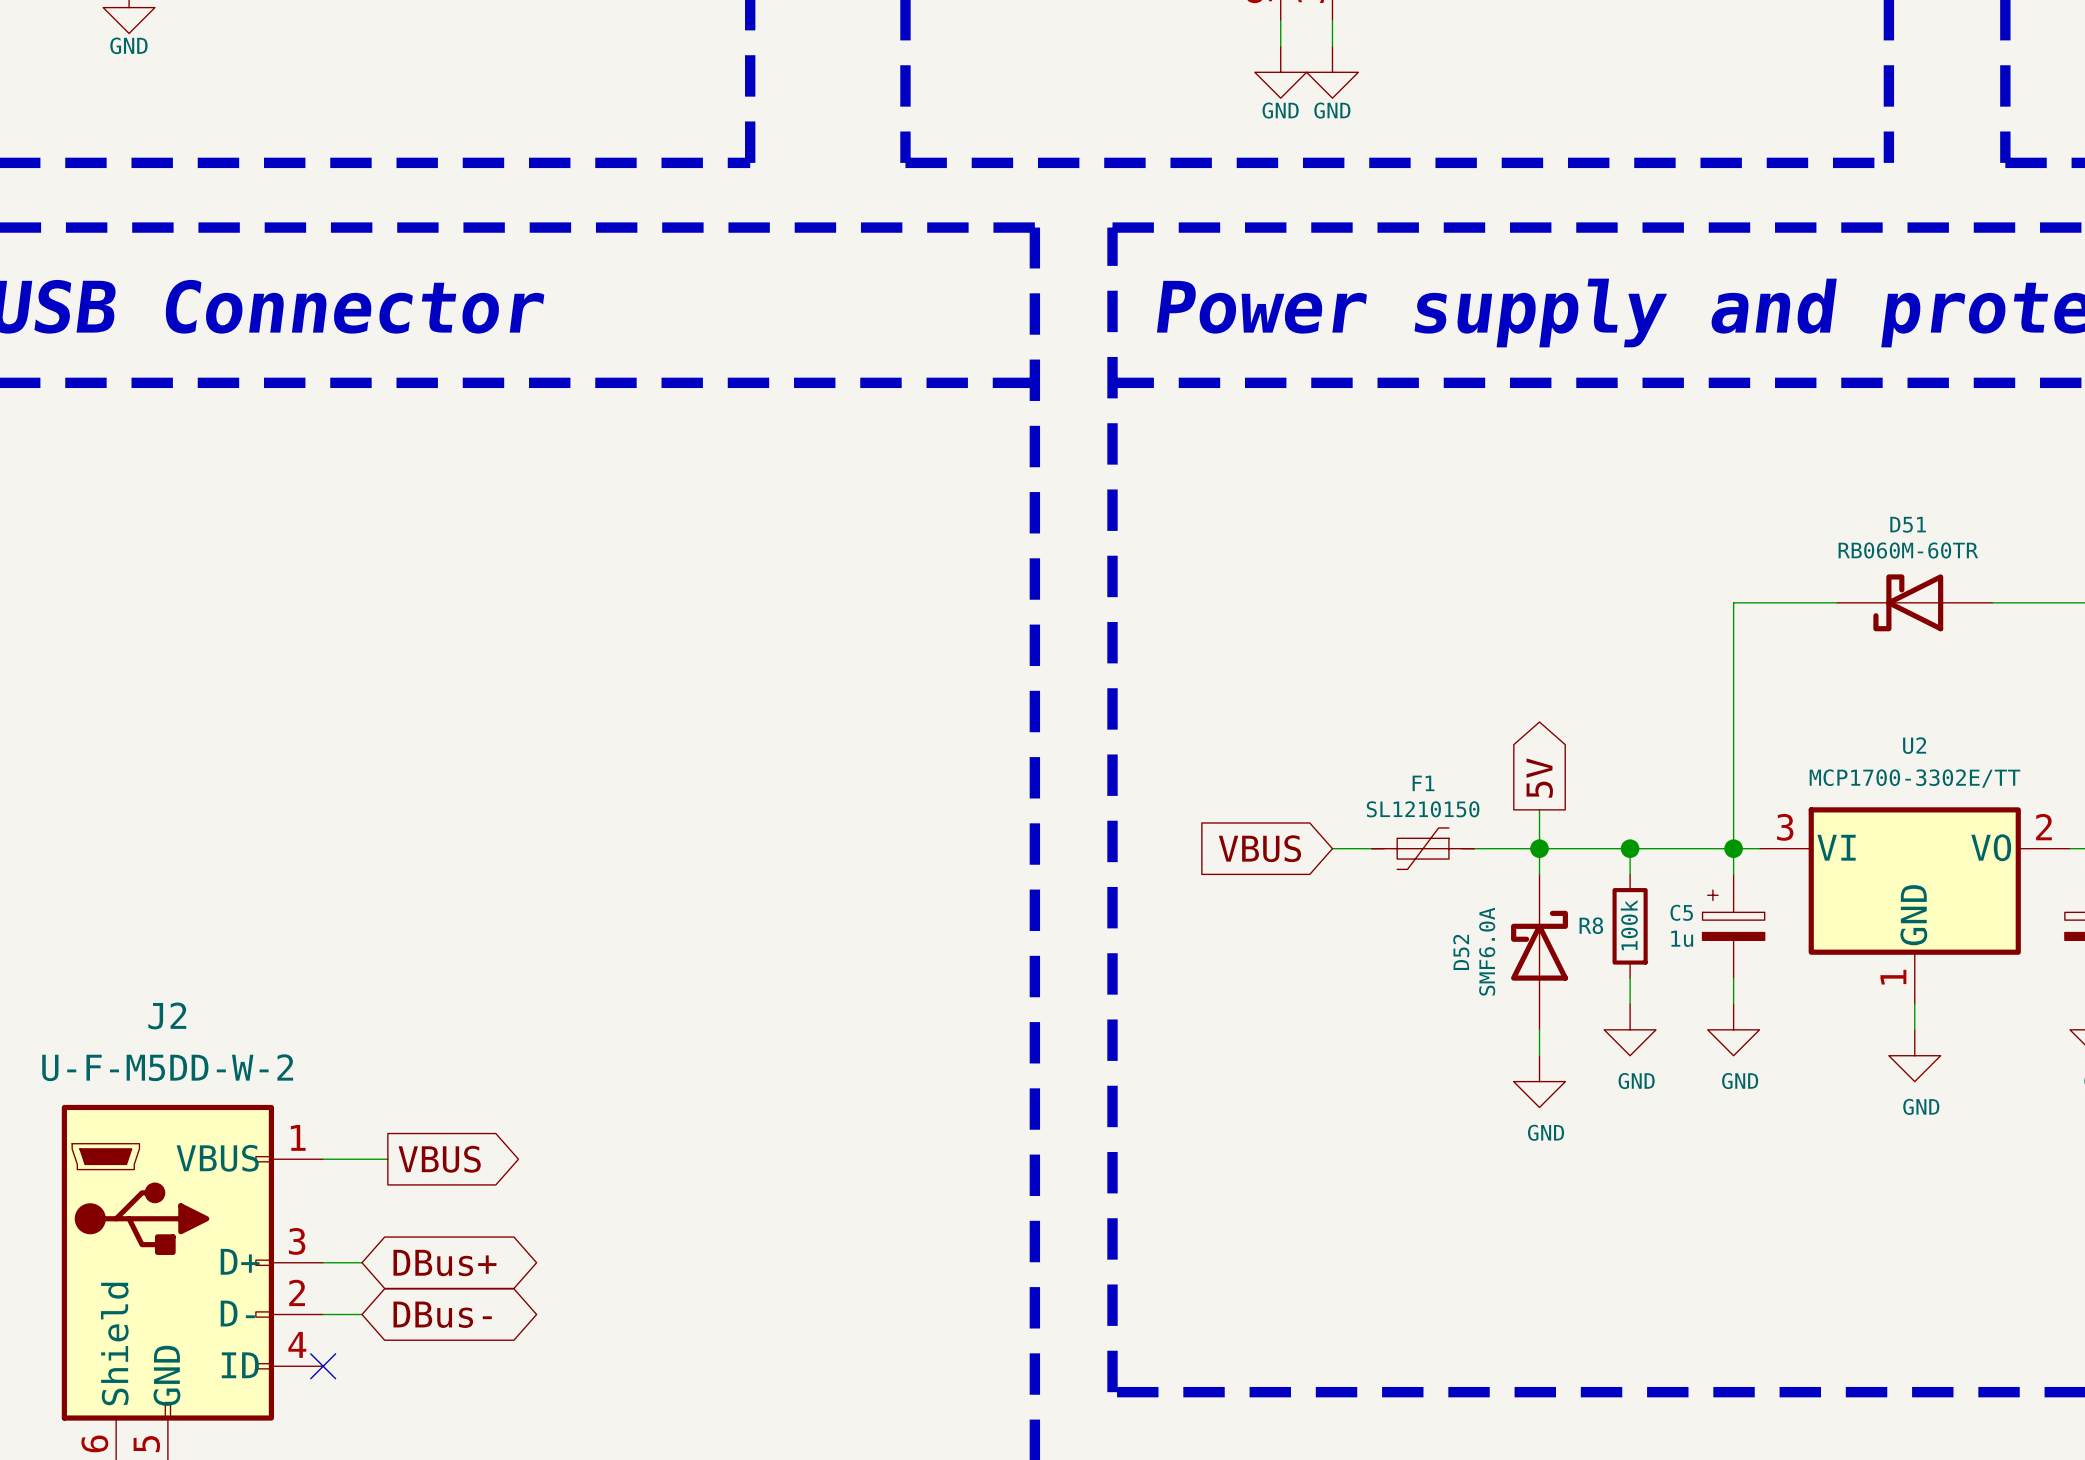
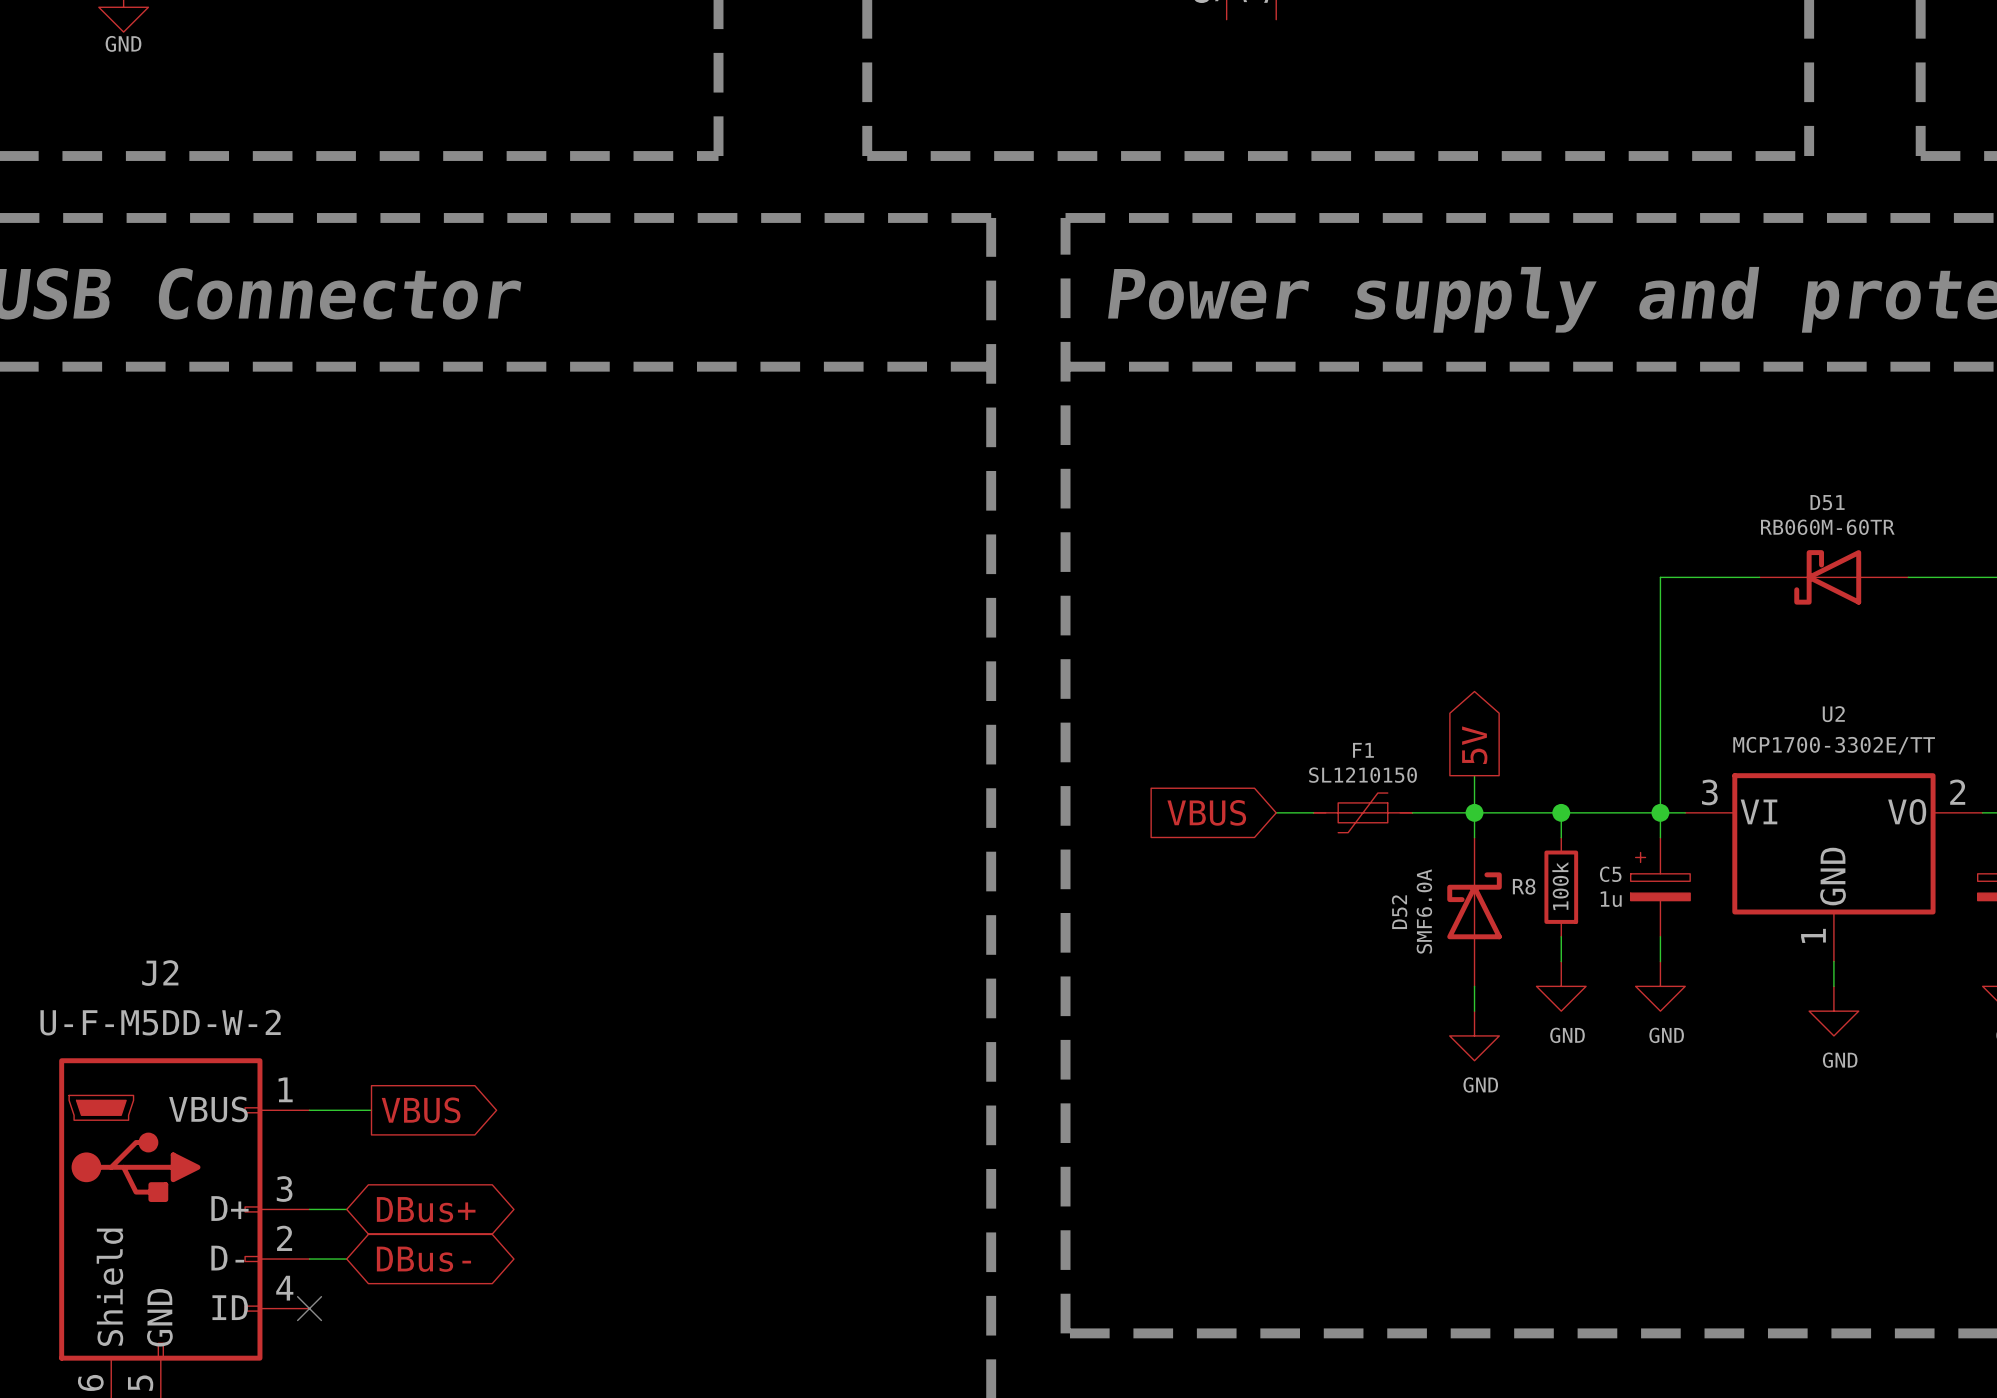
wire: (1280, 20) (1280, 46) -> none
wire: (1332, 20) (1332, 46) -> none
power symbol: GND (1280, 72) -> none
power symbol: GND (1332, 72) -> none

